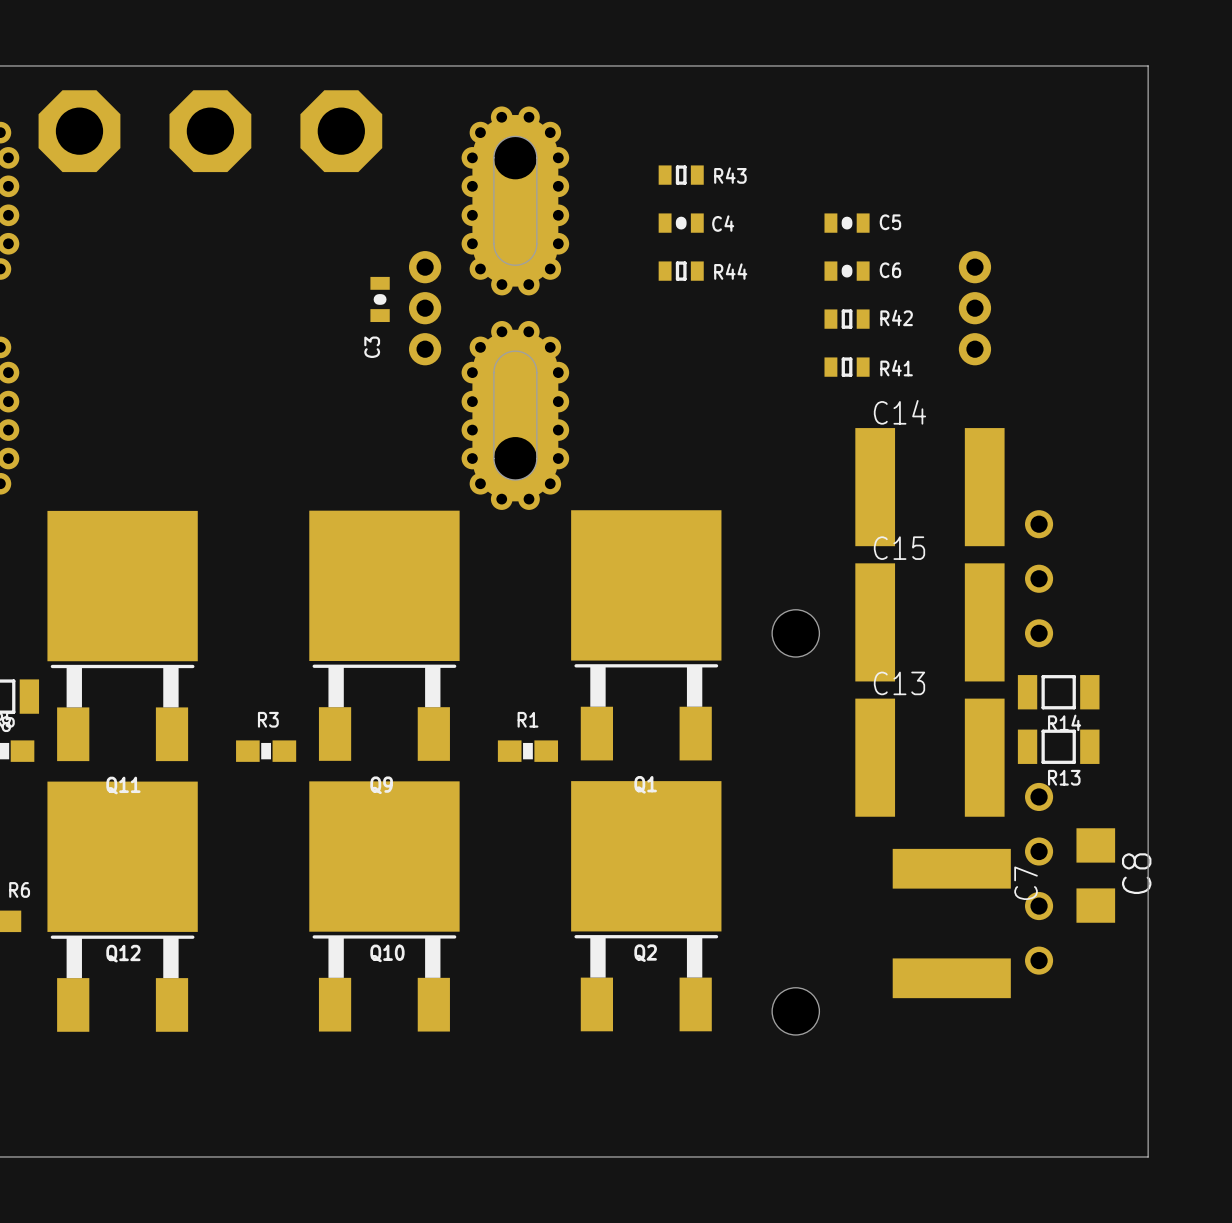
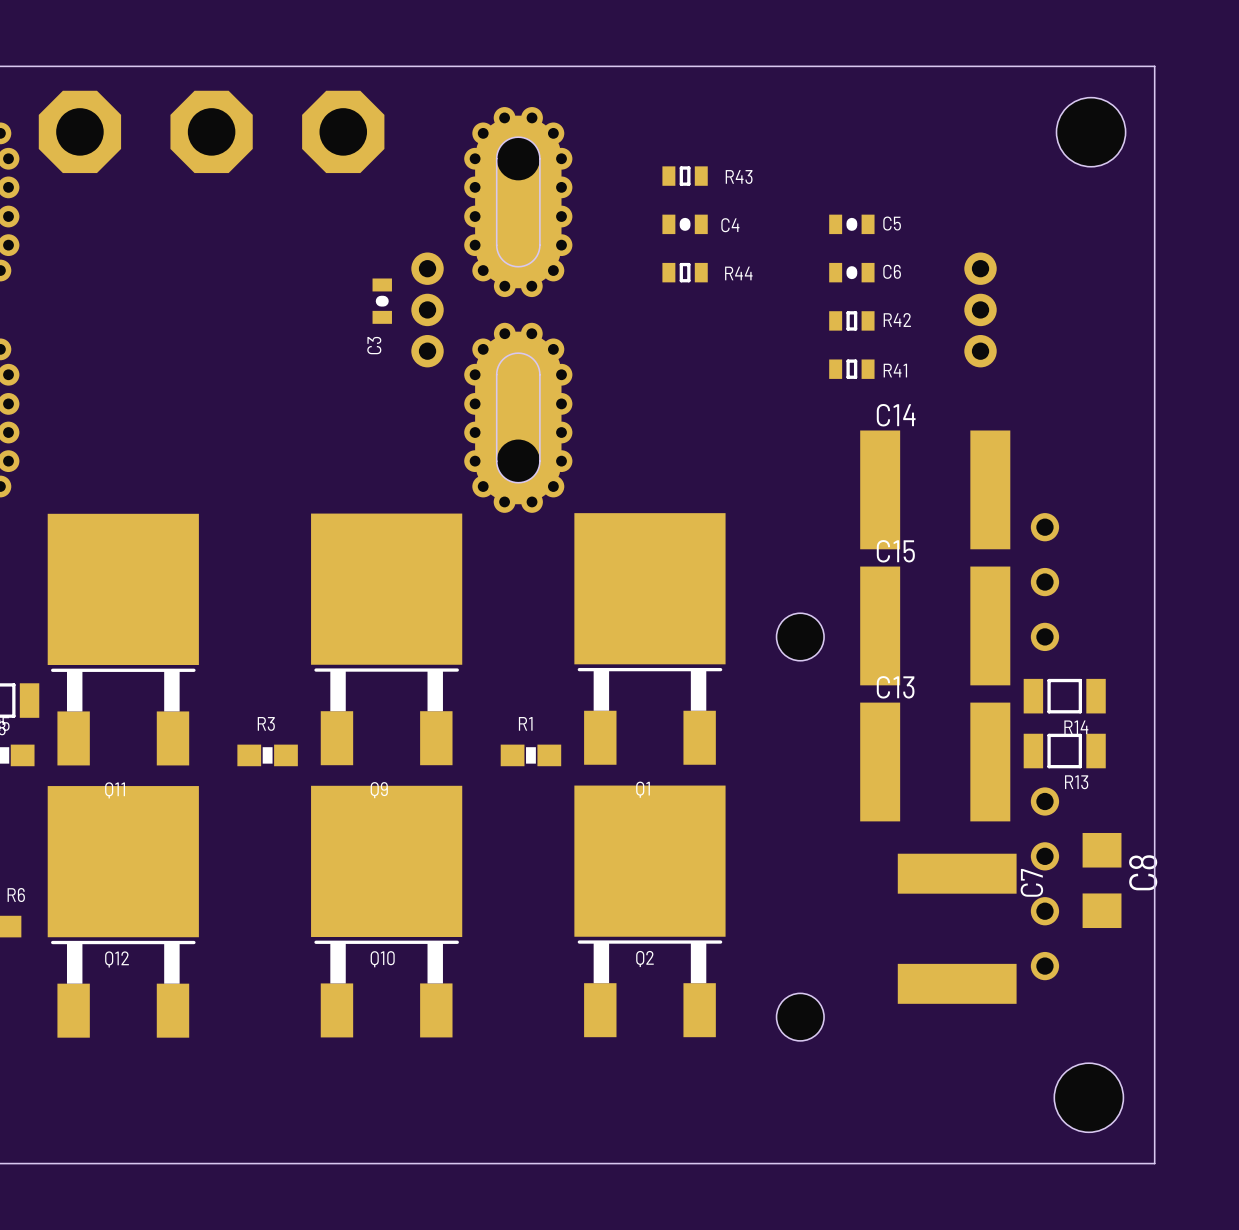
hole: none -> (1091, 132)
hole: none -> (1088, 1097)

